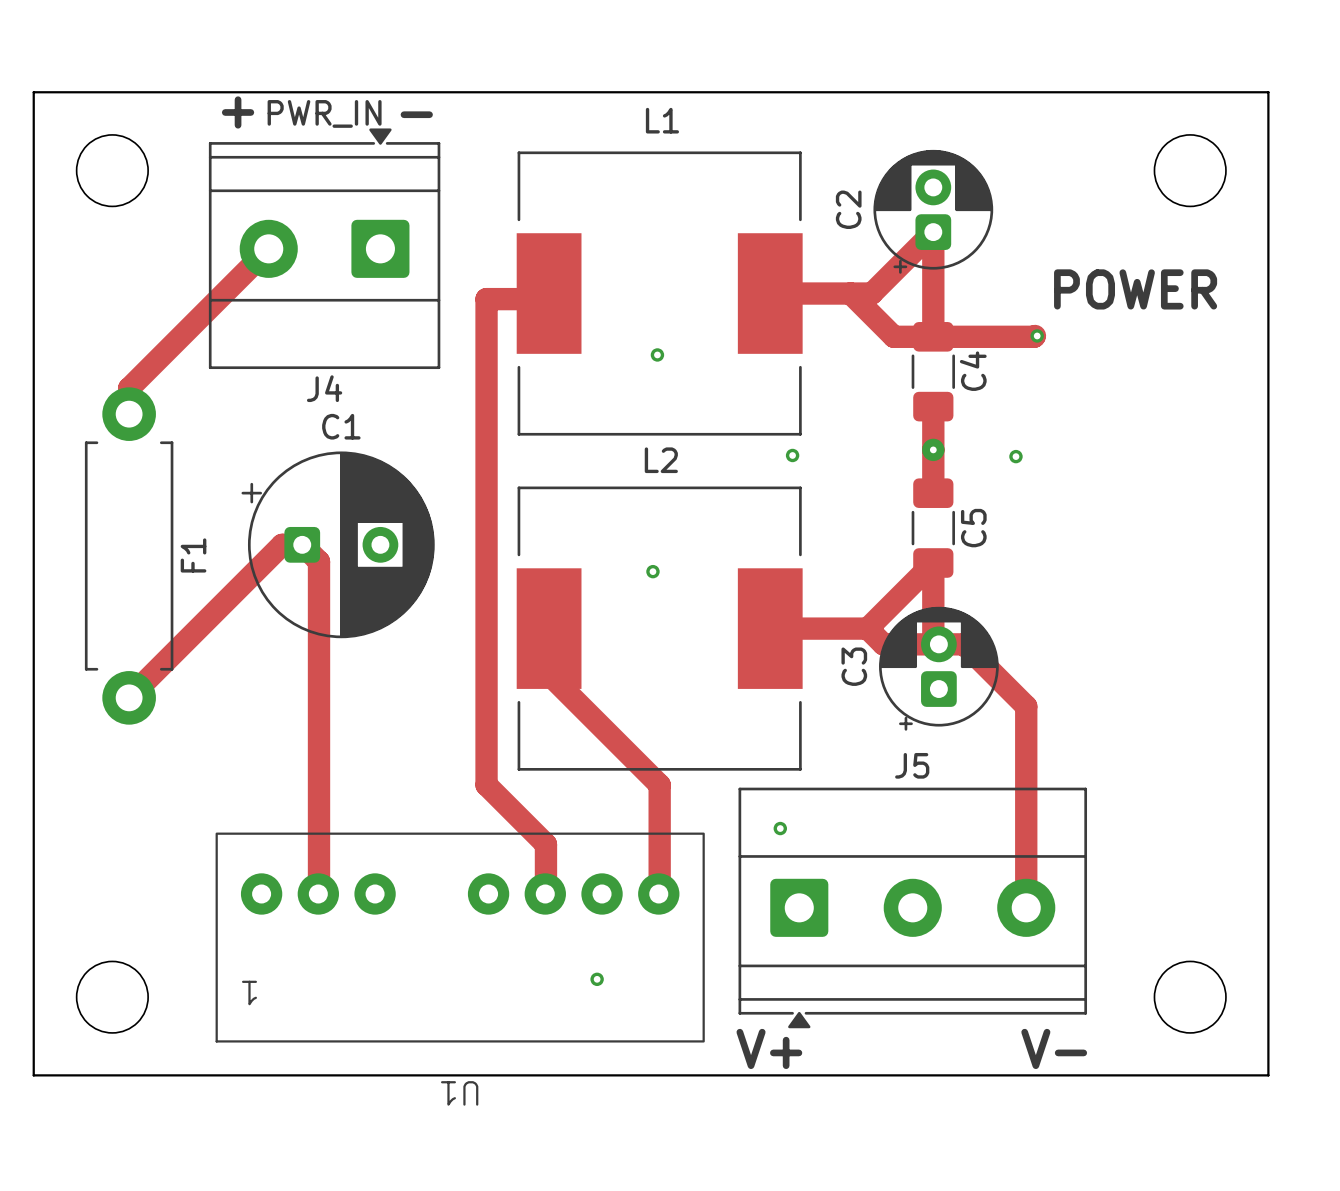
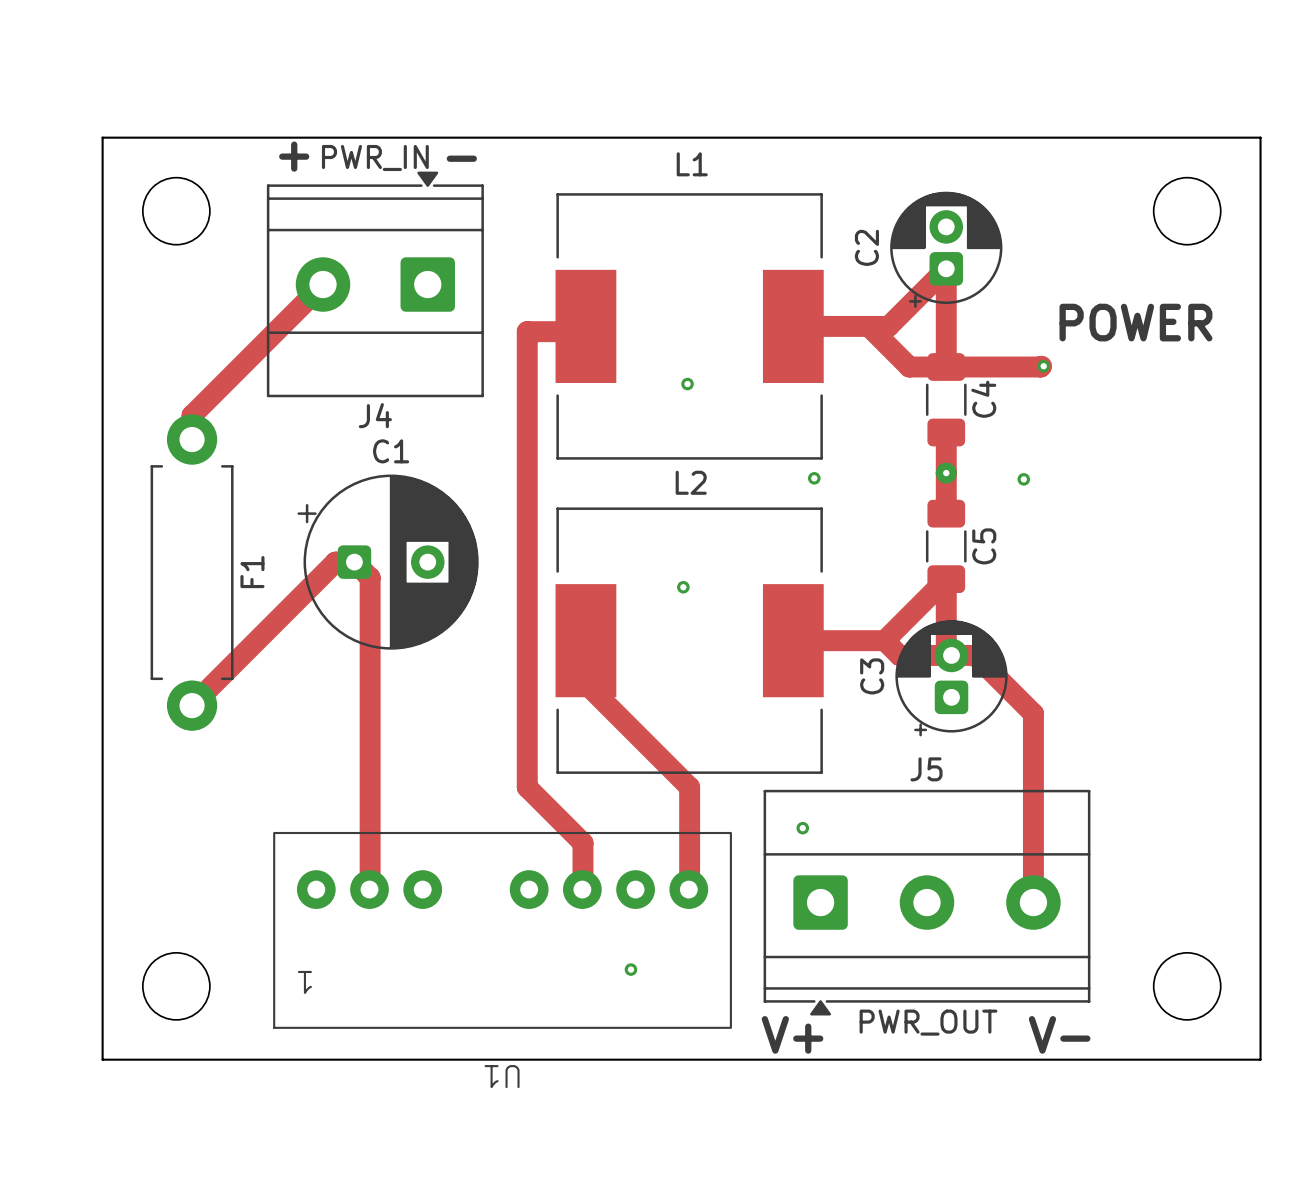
J5 value: none -> PWR_OUT (928, 1022)

